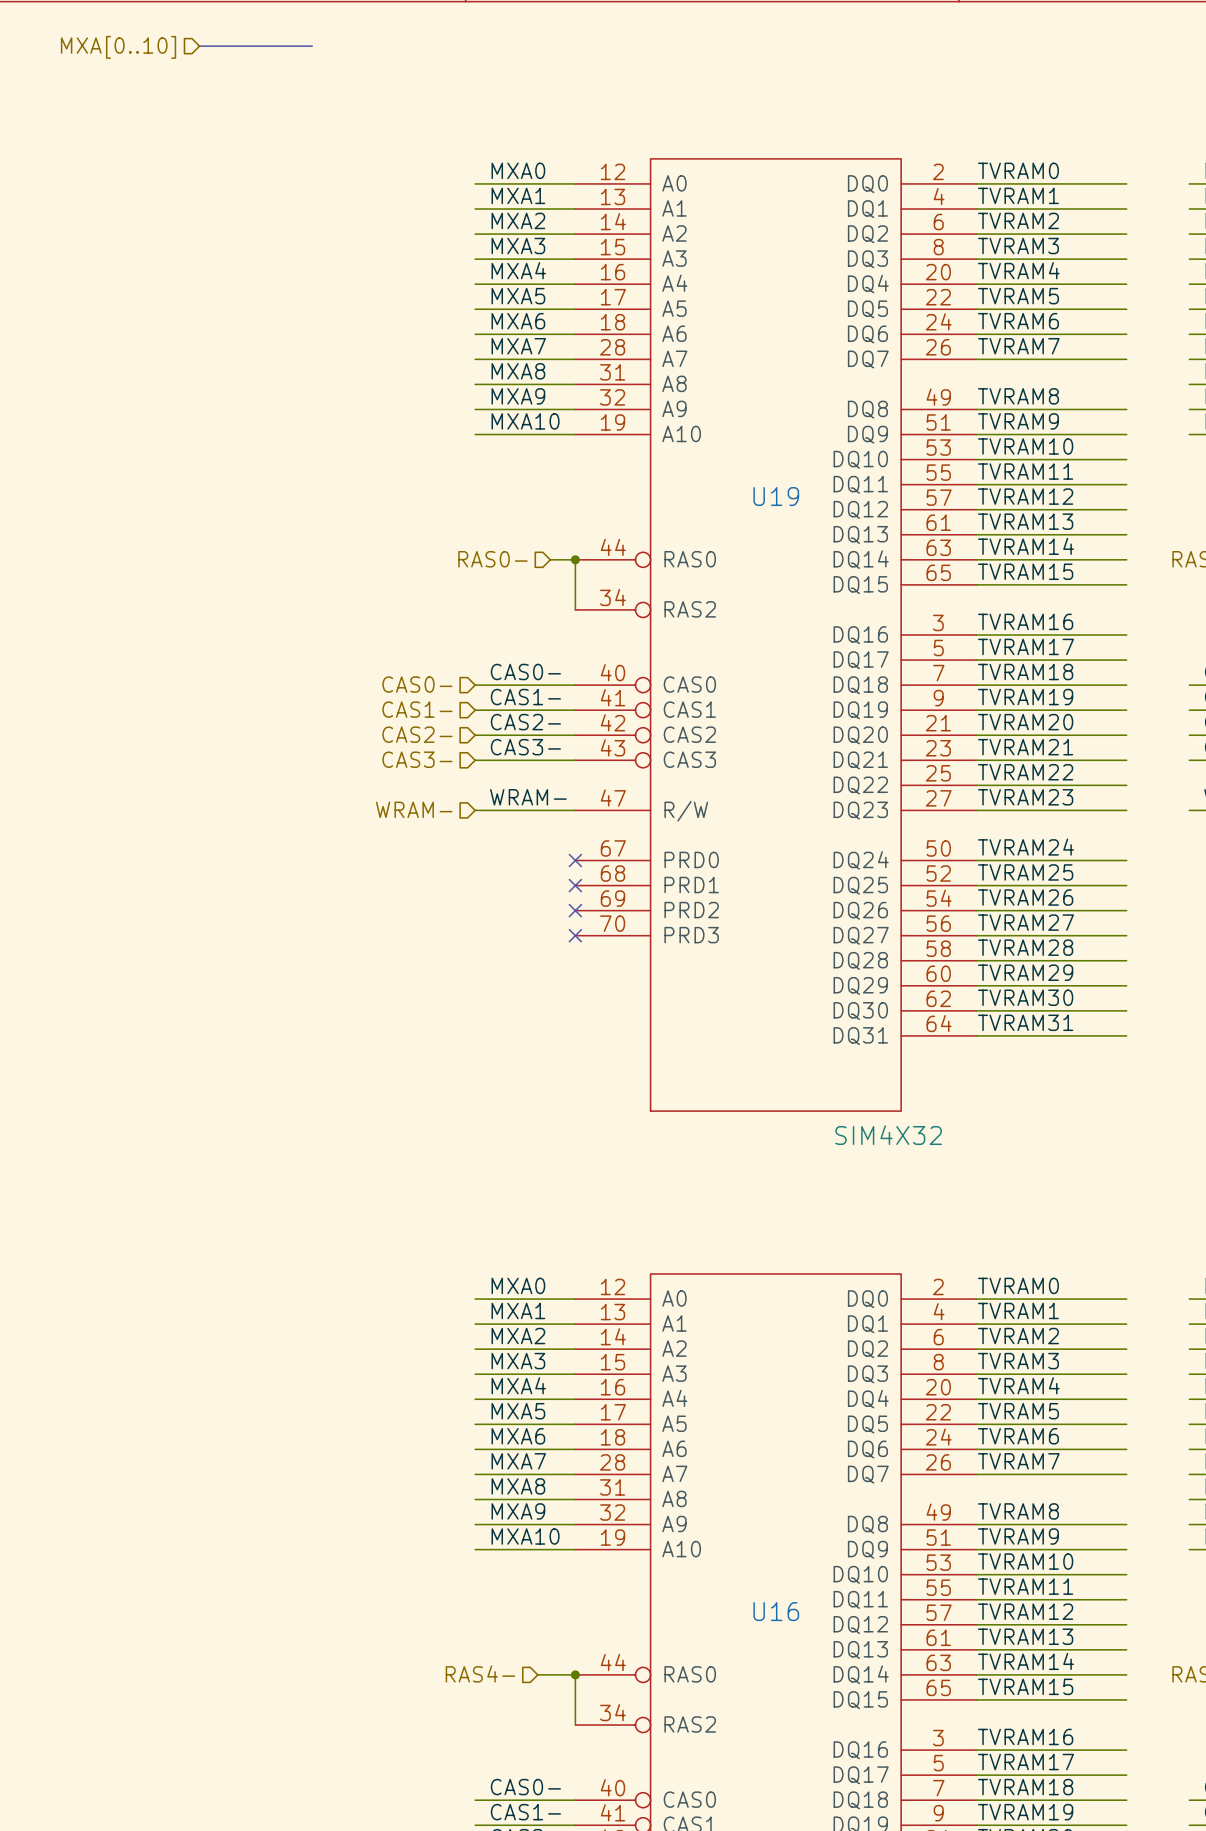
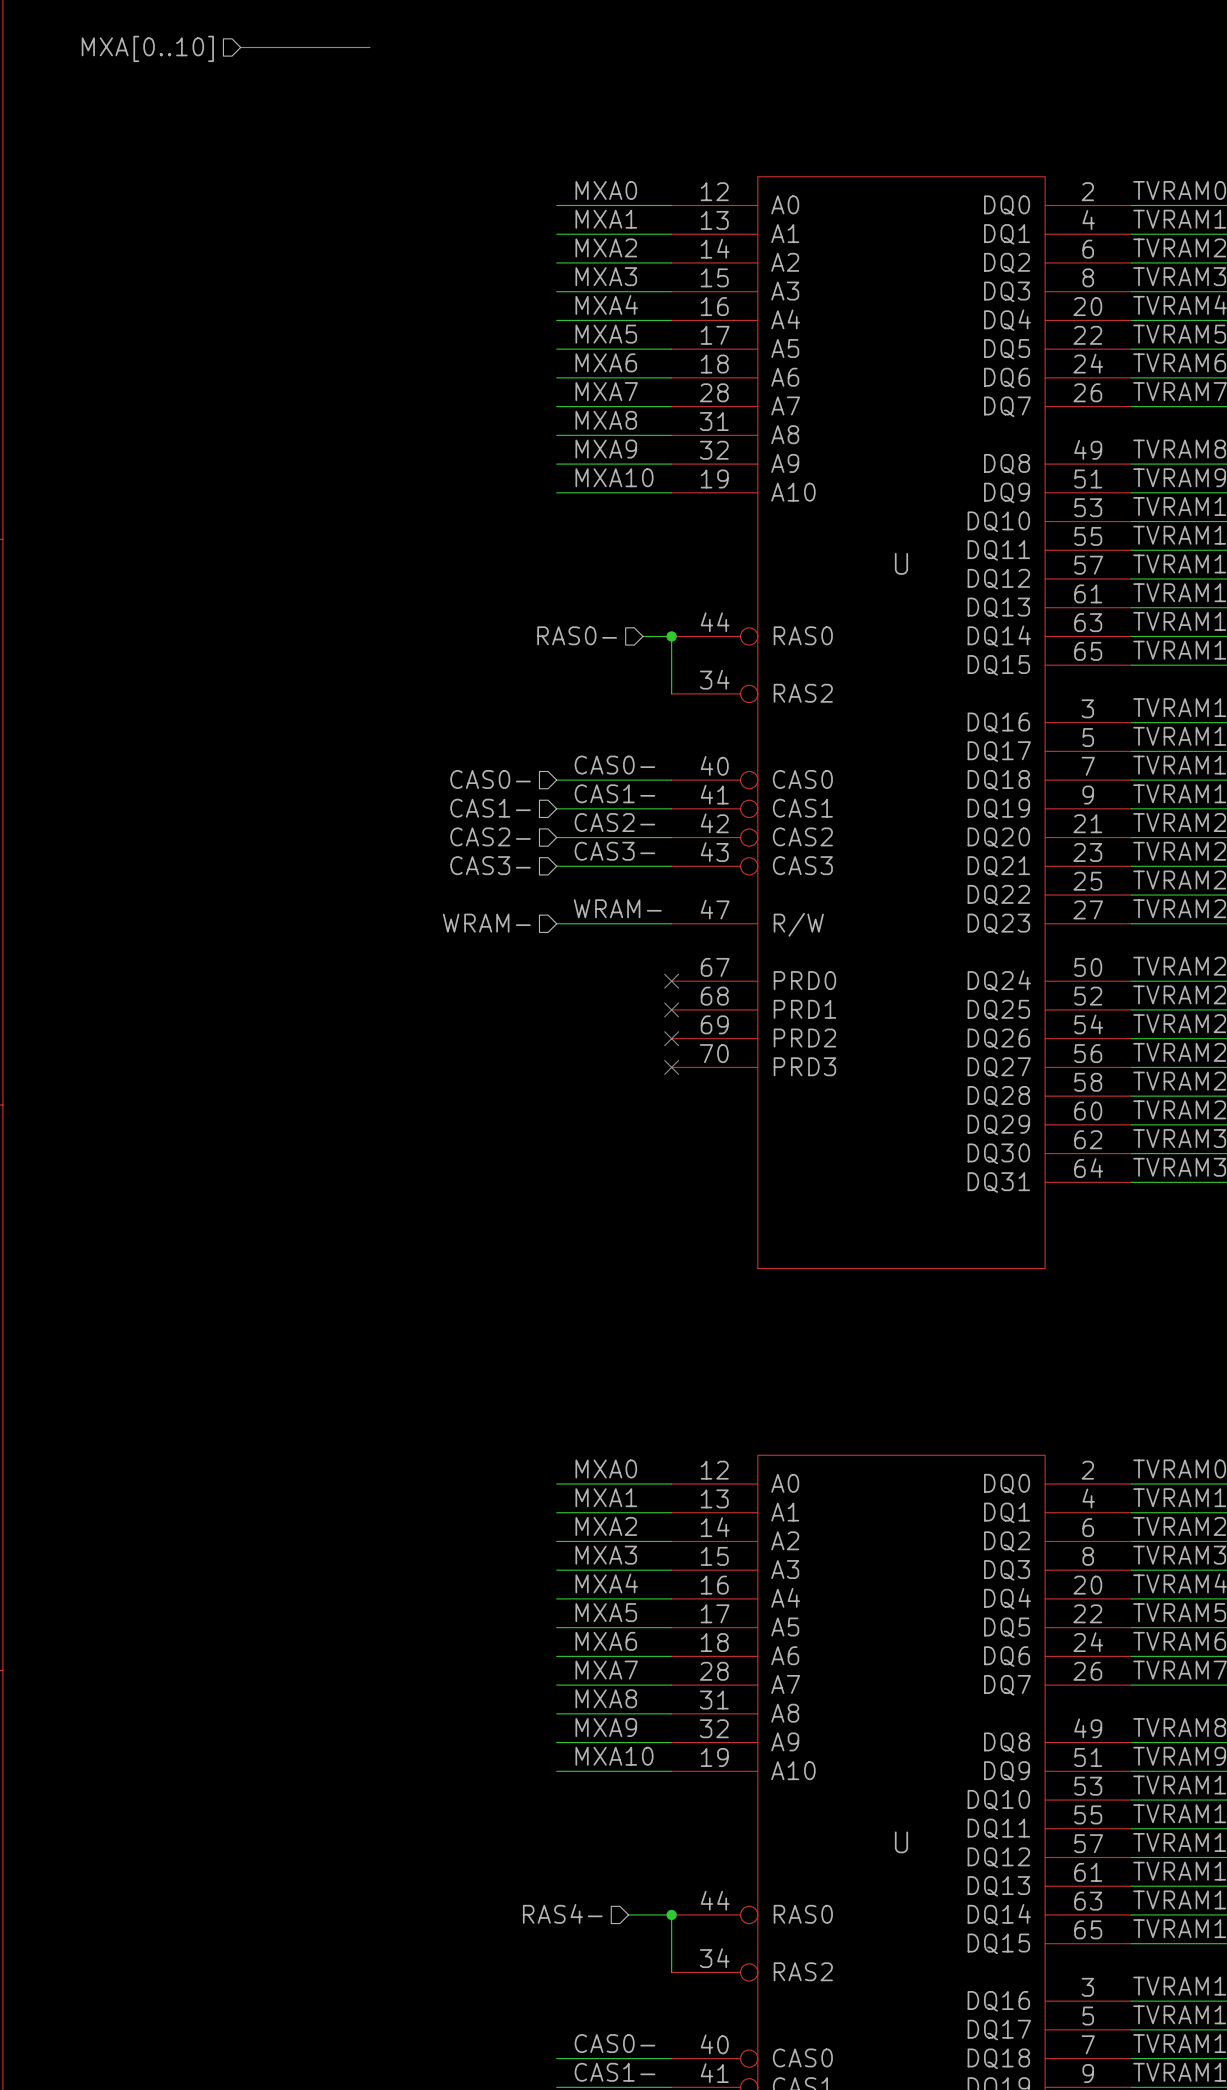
U19 name: U19 (776, 496) -> U (901, 563)
U19 value: SIM4X32 (888, 1135) -> none
U16 name: U16 (776, 1611) -> U (901, 1842)

